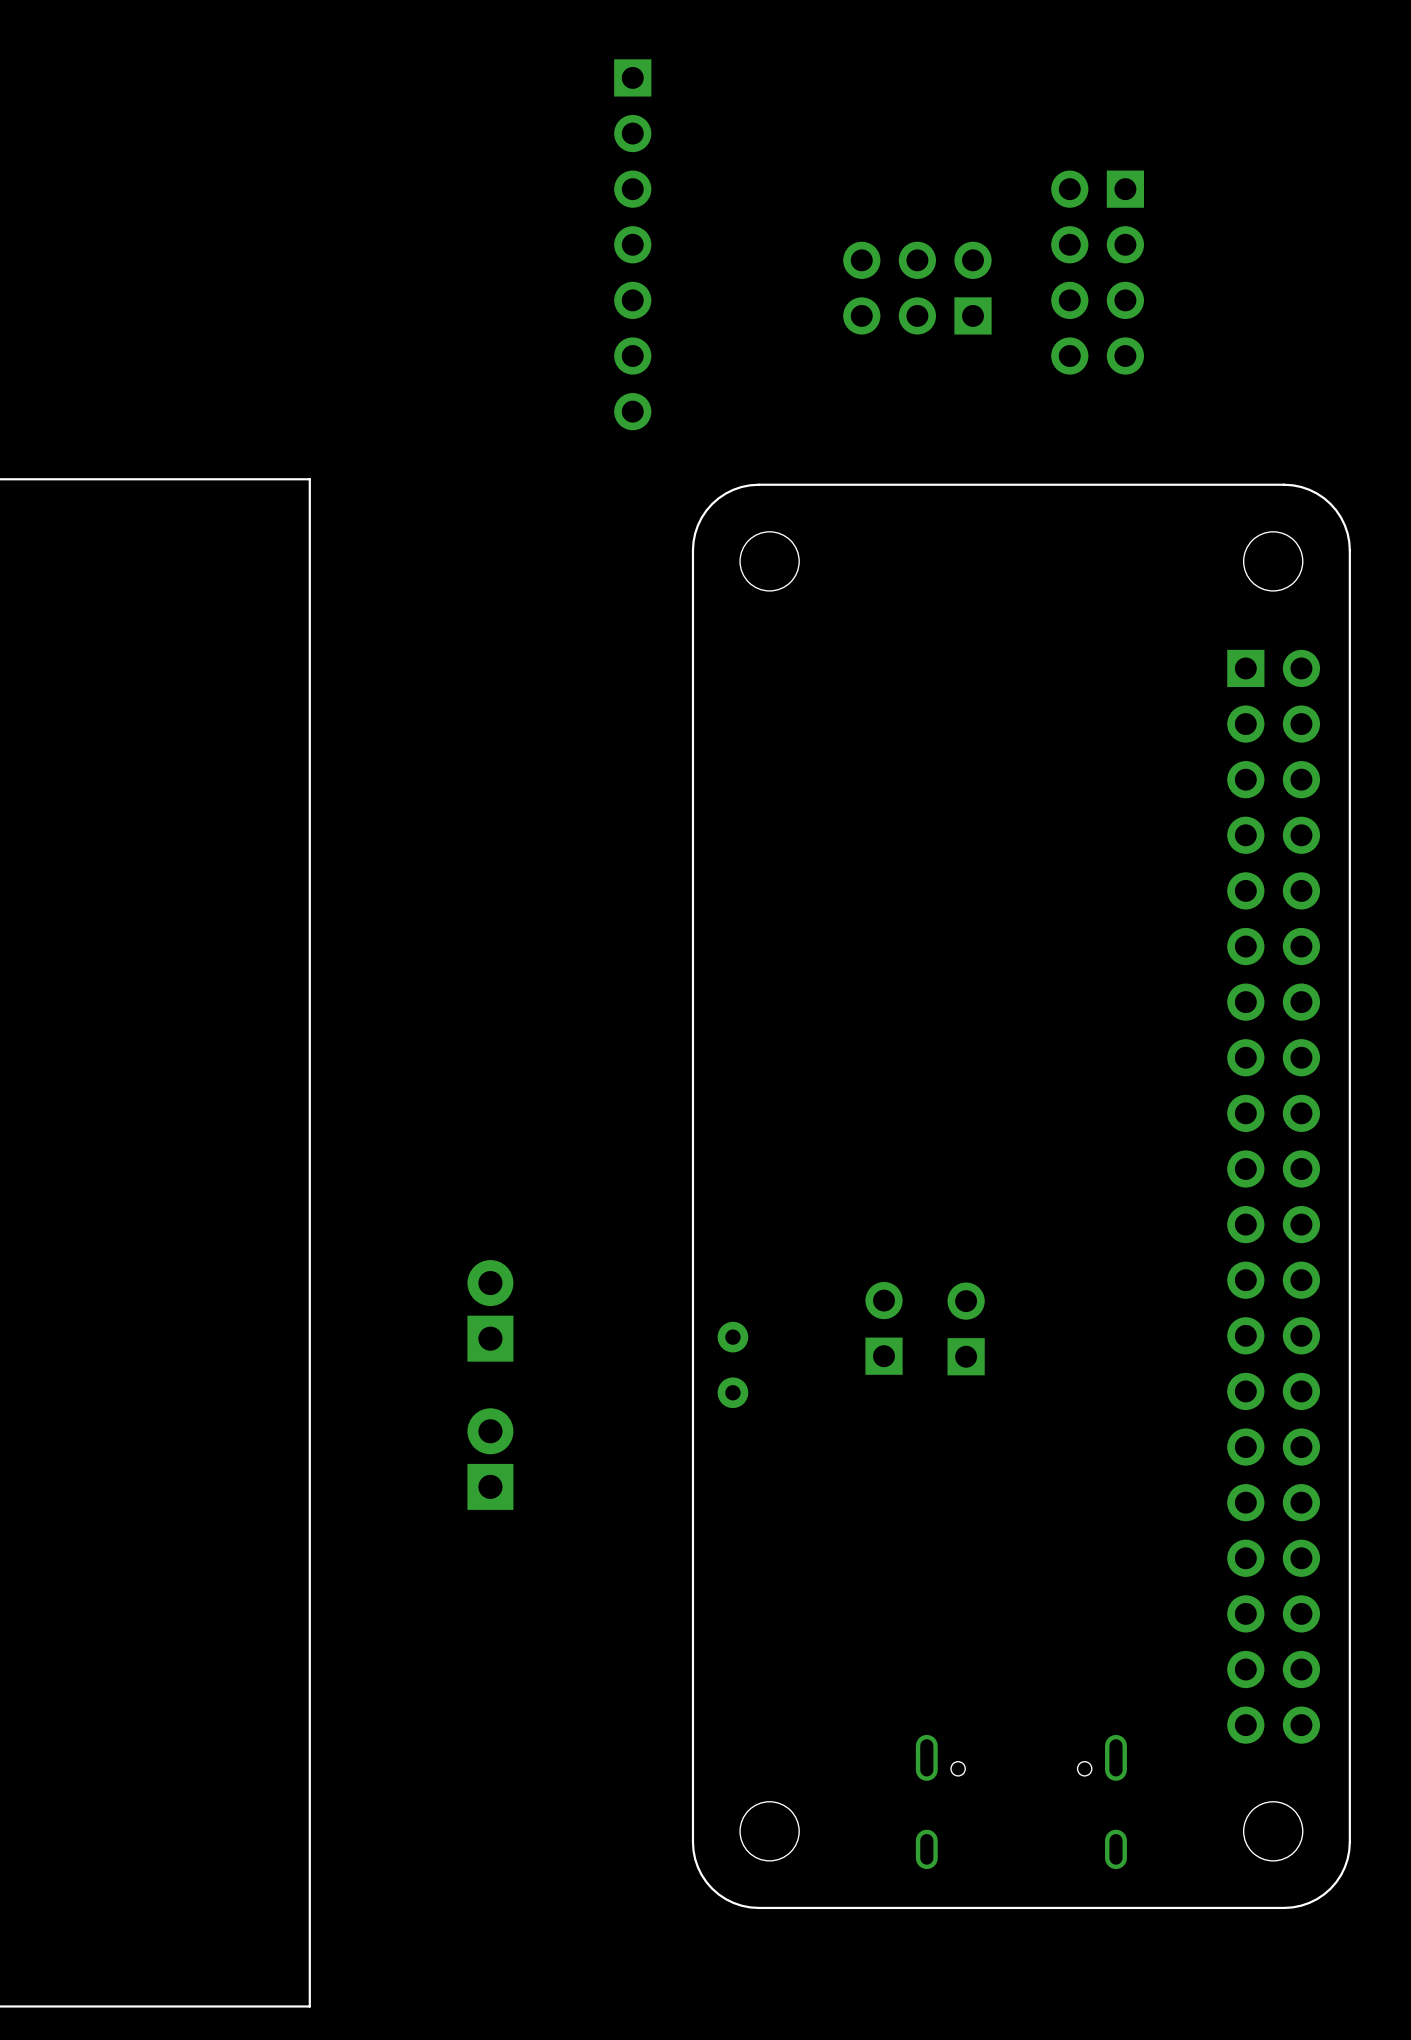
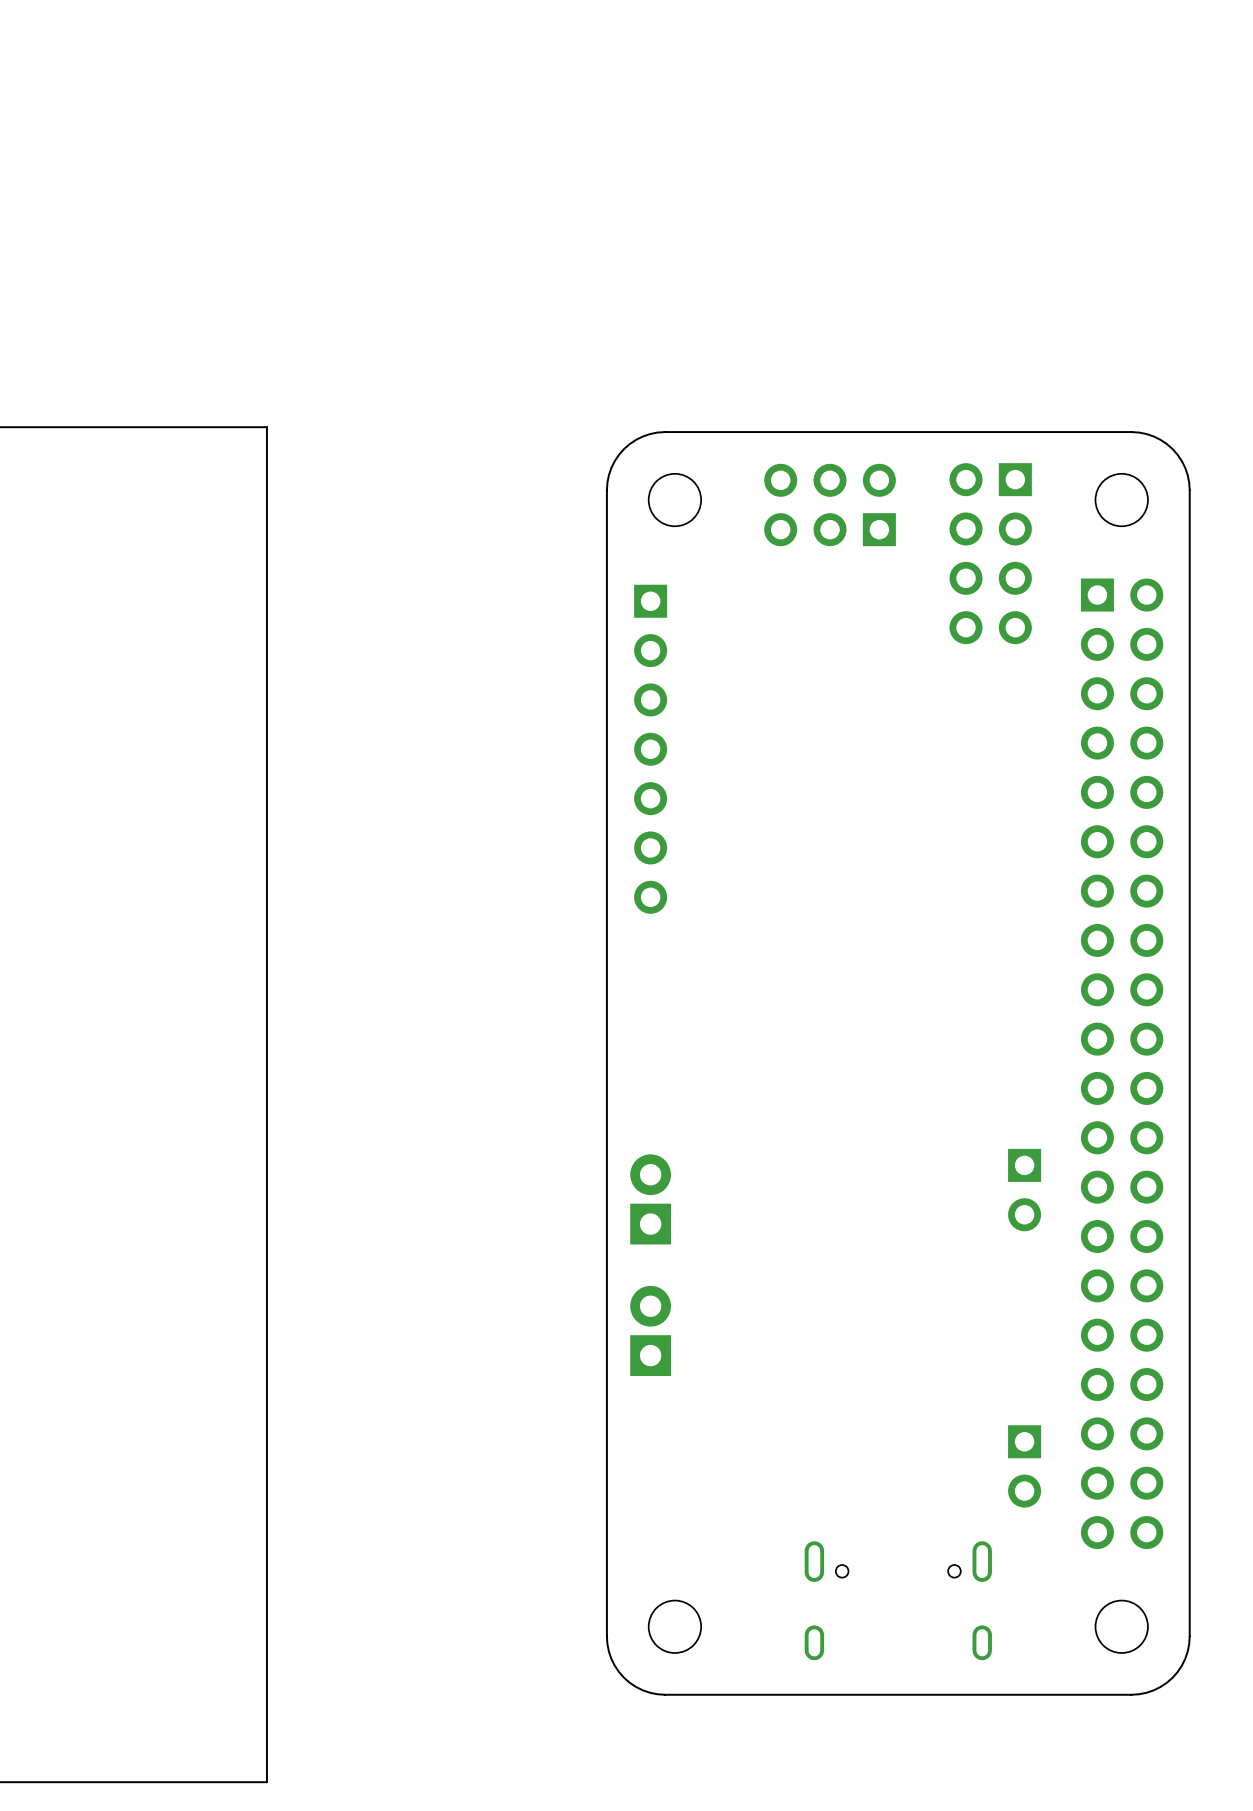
part: (632, 244) -> none
part position: (1097, 272) -> (990, 553)
part position: (917, 288) -> (830, 504)
part: none -> (650, 749)
part: (490, 1310) -> none
part footprint: [717, 1321, 749, 1409] -> [630, 1154, 672, 1245]
part: (884, 1328) -> none
part: (966, 1328) -> none
part: none -> (1024, 1190)
part: (490, 1459) -> none
part: none -> (650, 1330)
part: none -> (1024, 1466)

